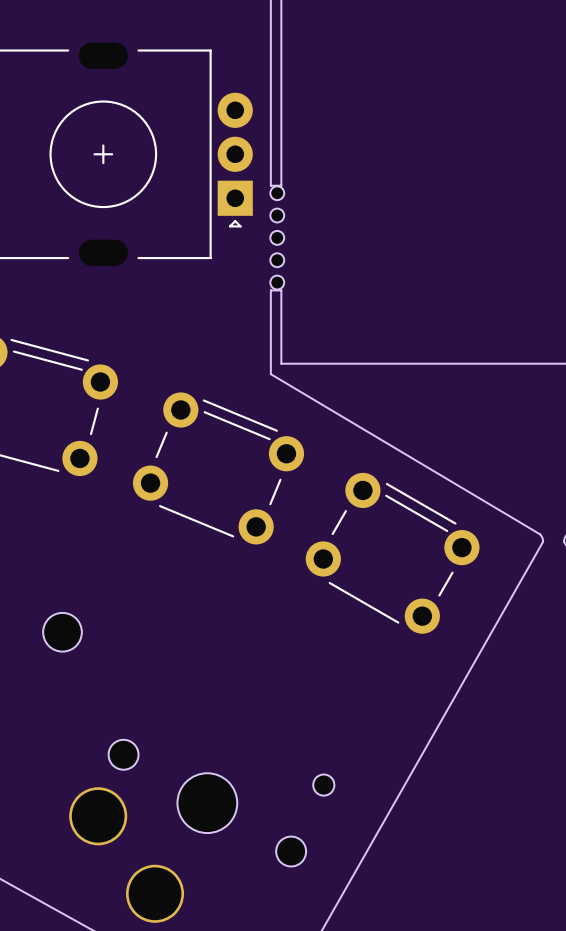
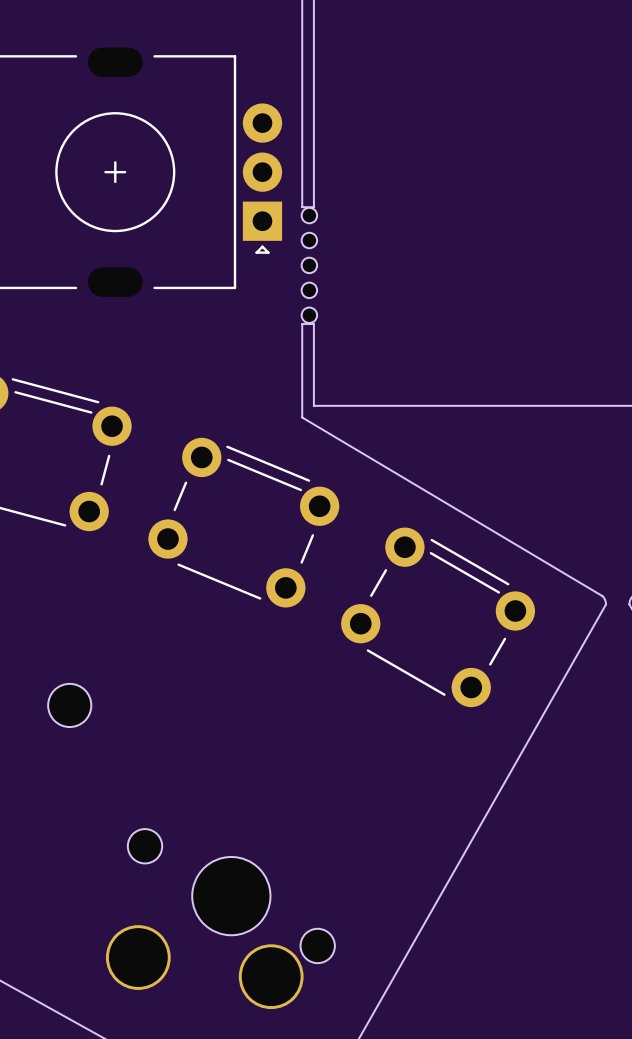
part footprint: [69, 739, 335, 923] -> [105, 829, 335, 1010]

